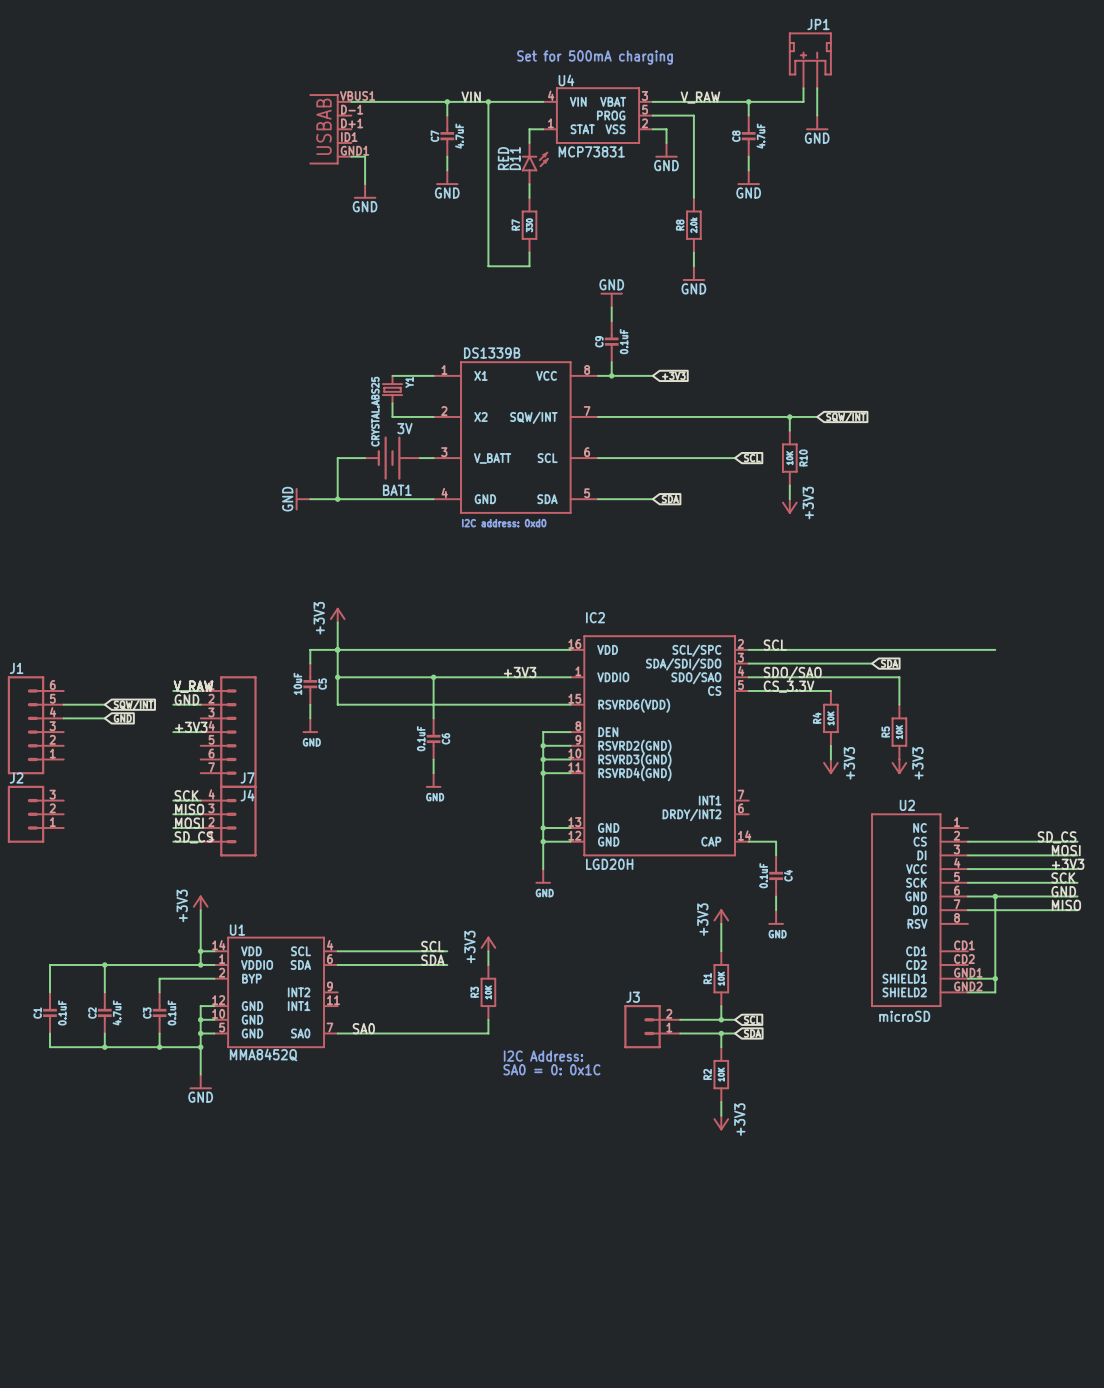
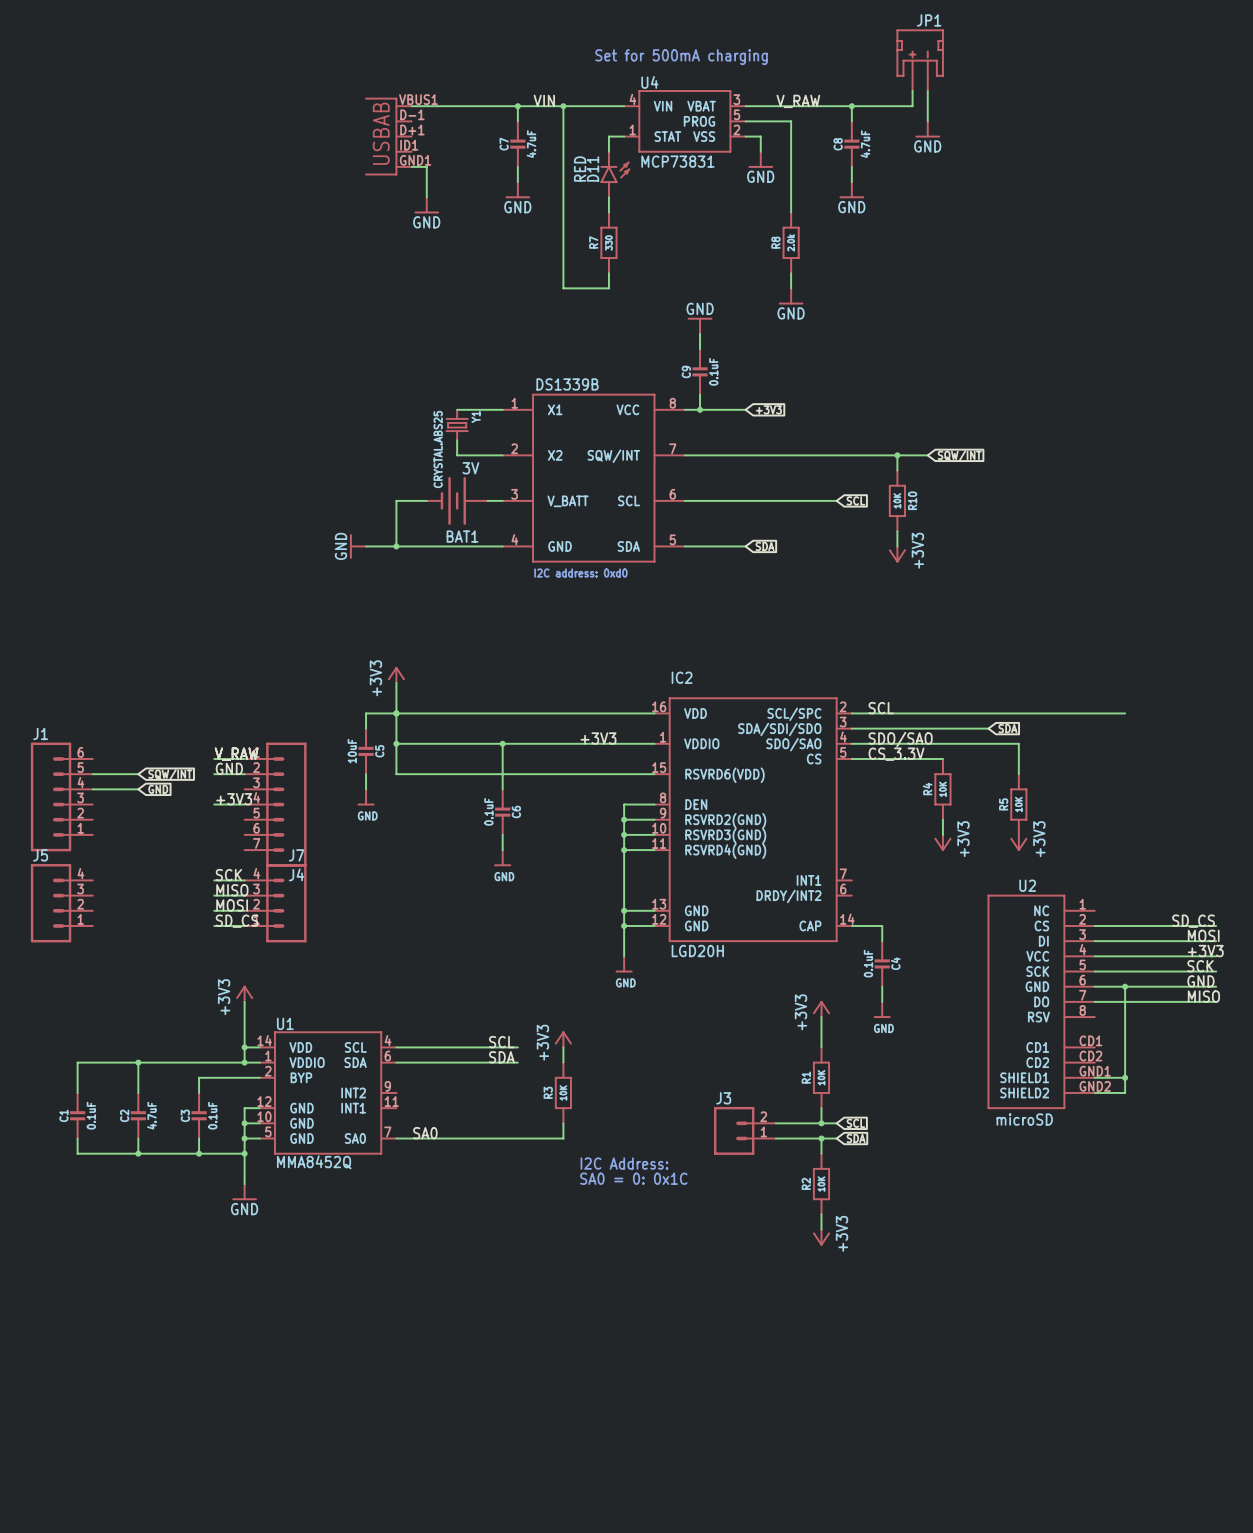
J2: (35, 814) -> none
J5: none -> (61, 903)

